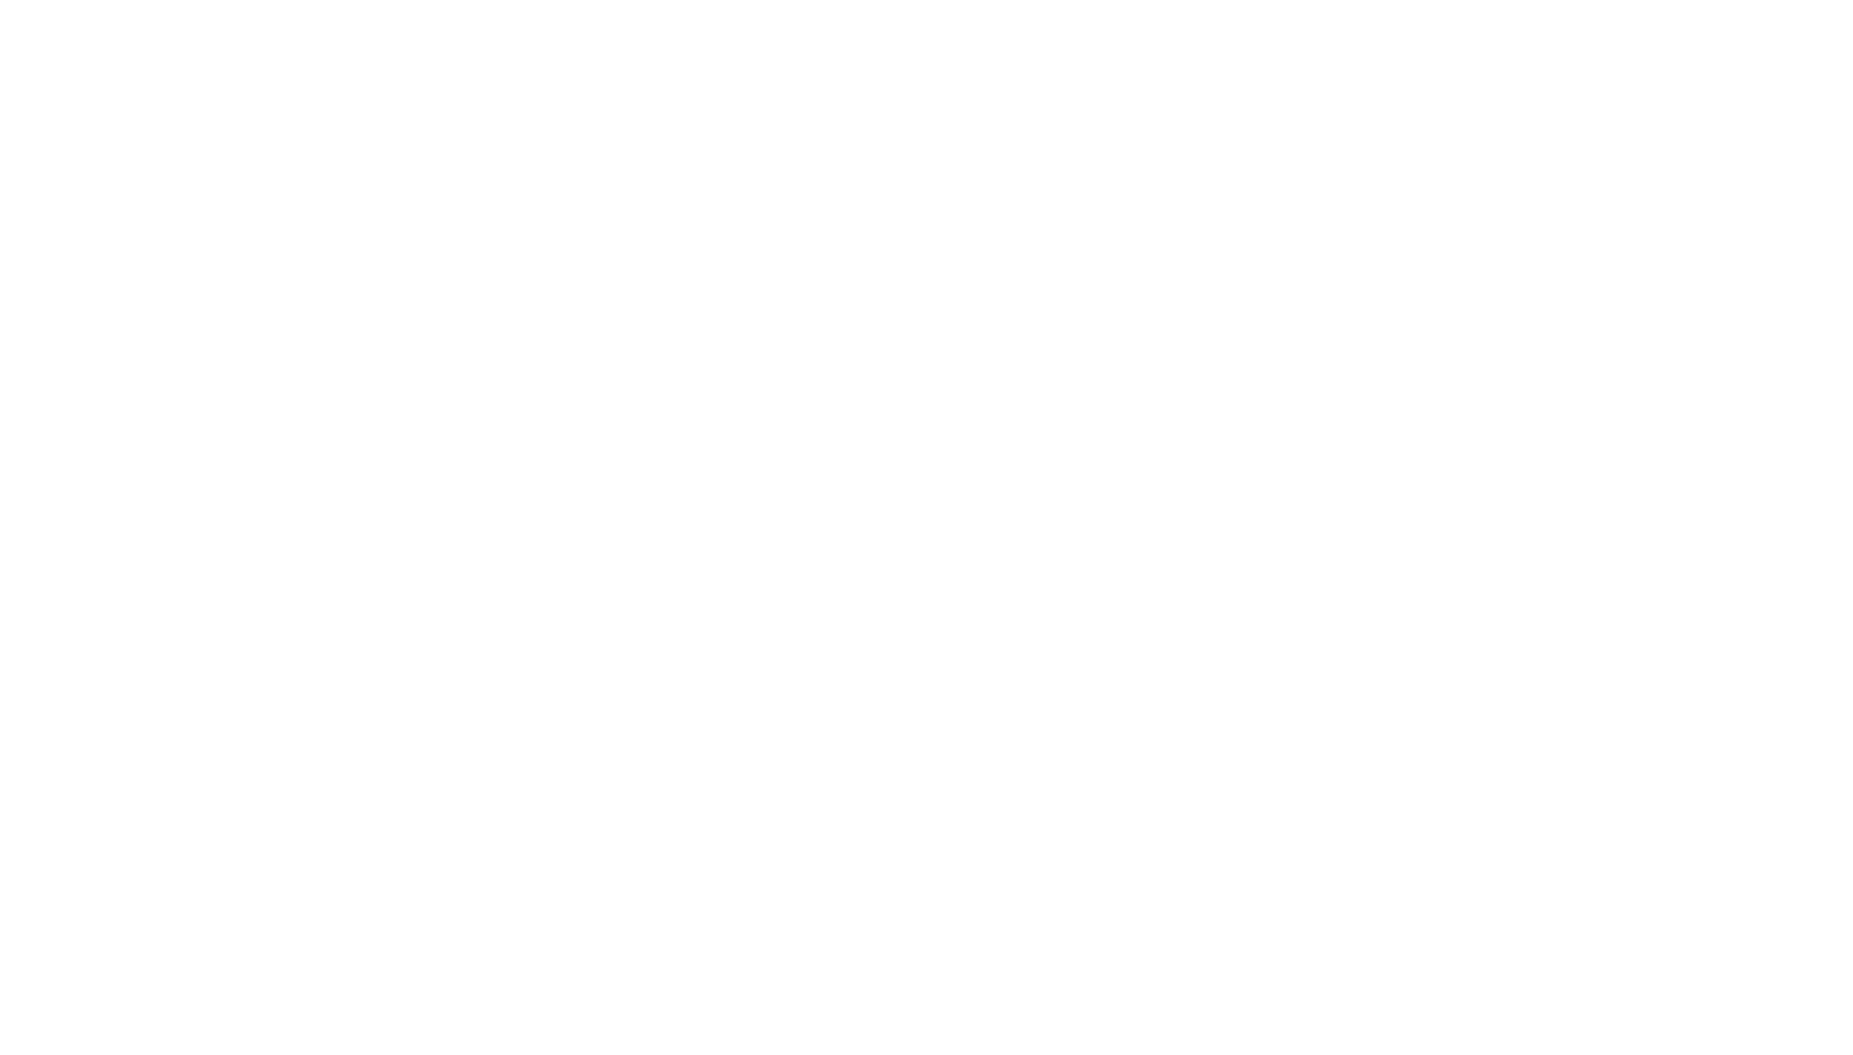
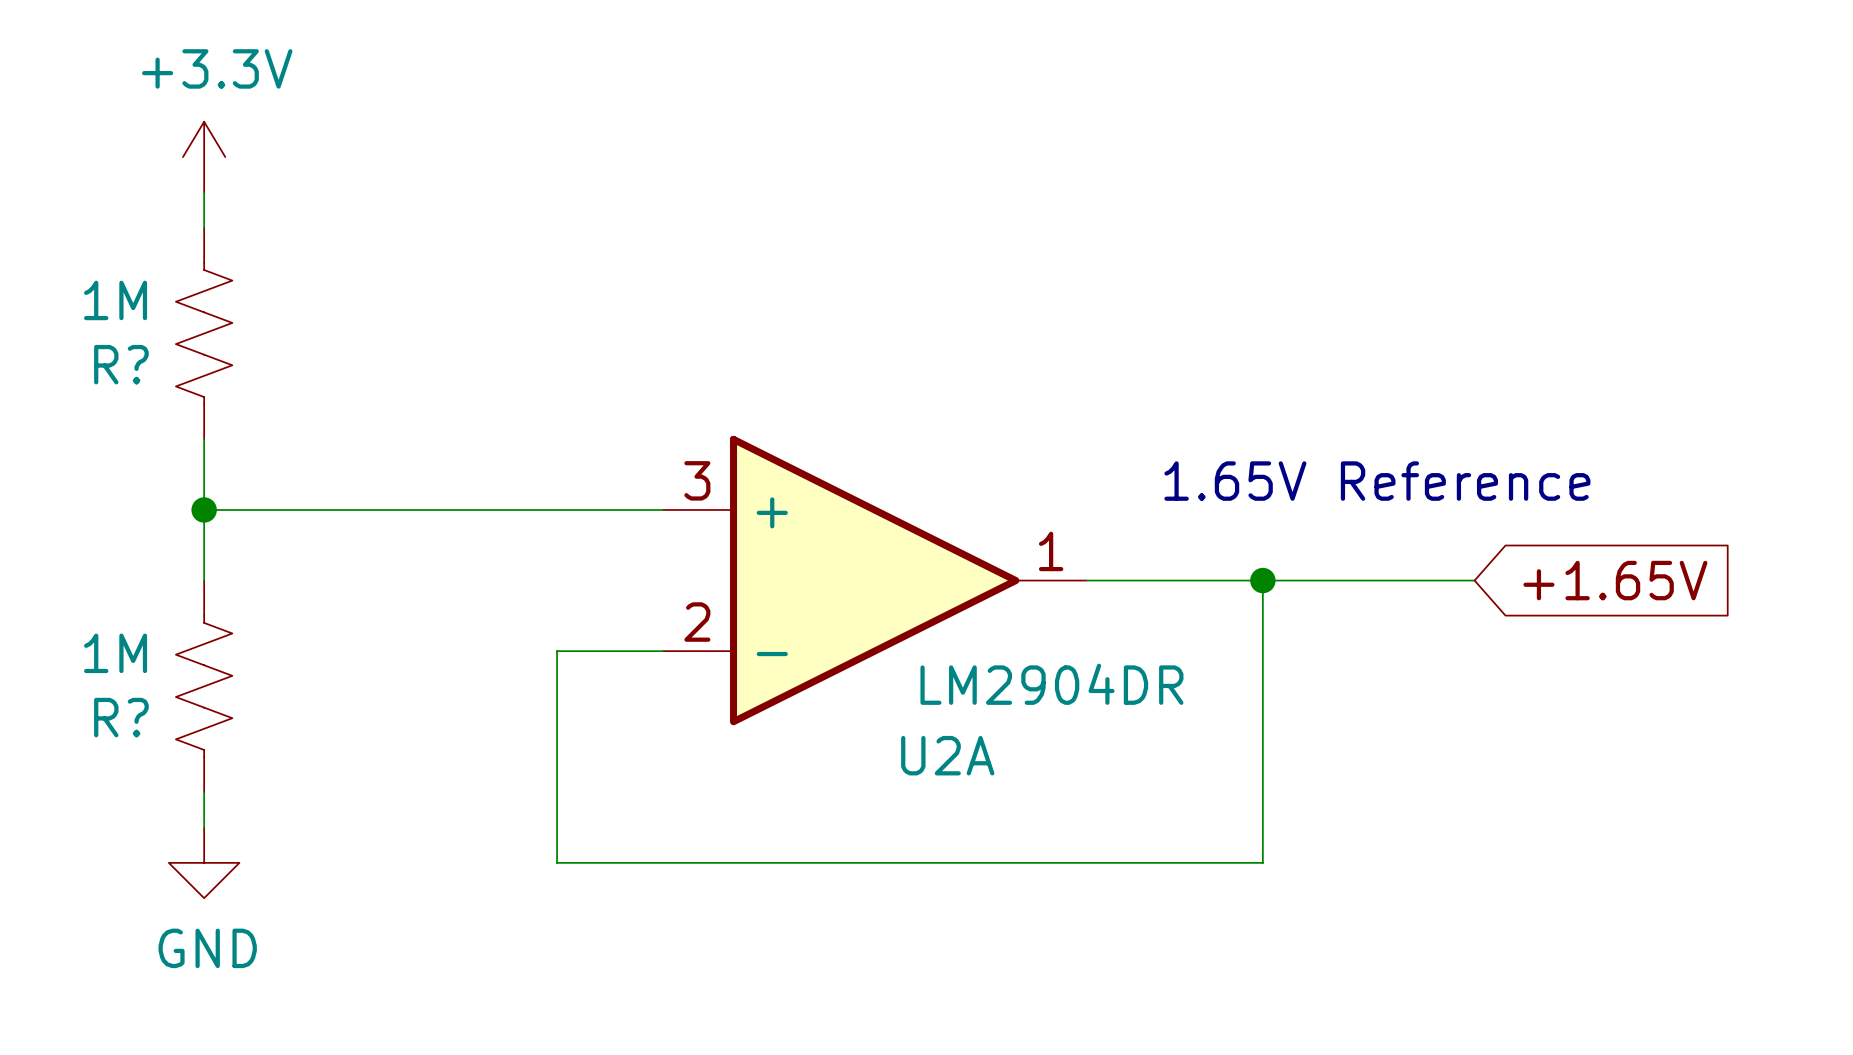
power symbol: none -> +3.3V (204, 157)
wire: none -> (204, 192) (204, 227)
R?: none -> 1M (204, 333)
wire: none -> (204, 439) (204, 580)
text: none -> 1.65V Reference (1377, 481)
wire: none -> (204, 509) (662, 509)
junction: none -> (204, 509)
U2A: none -> LM2904DR (874, 580)
wire: none -> (1086, 580) (1474, 580)
wire: none -> (1262, 580) (1262, 862) (557, 862) (557, 651) (662, 651)
junction: none -> (1262, 580)
global label: none -> +1.65V (1615, 580)
R?: none -> 1M (204, 686)
wire: none -> (204, 792) (204, 827)
power symbol: none -> GND (204, 862)

